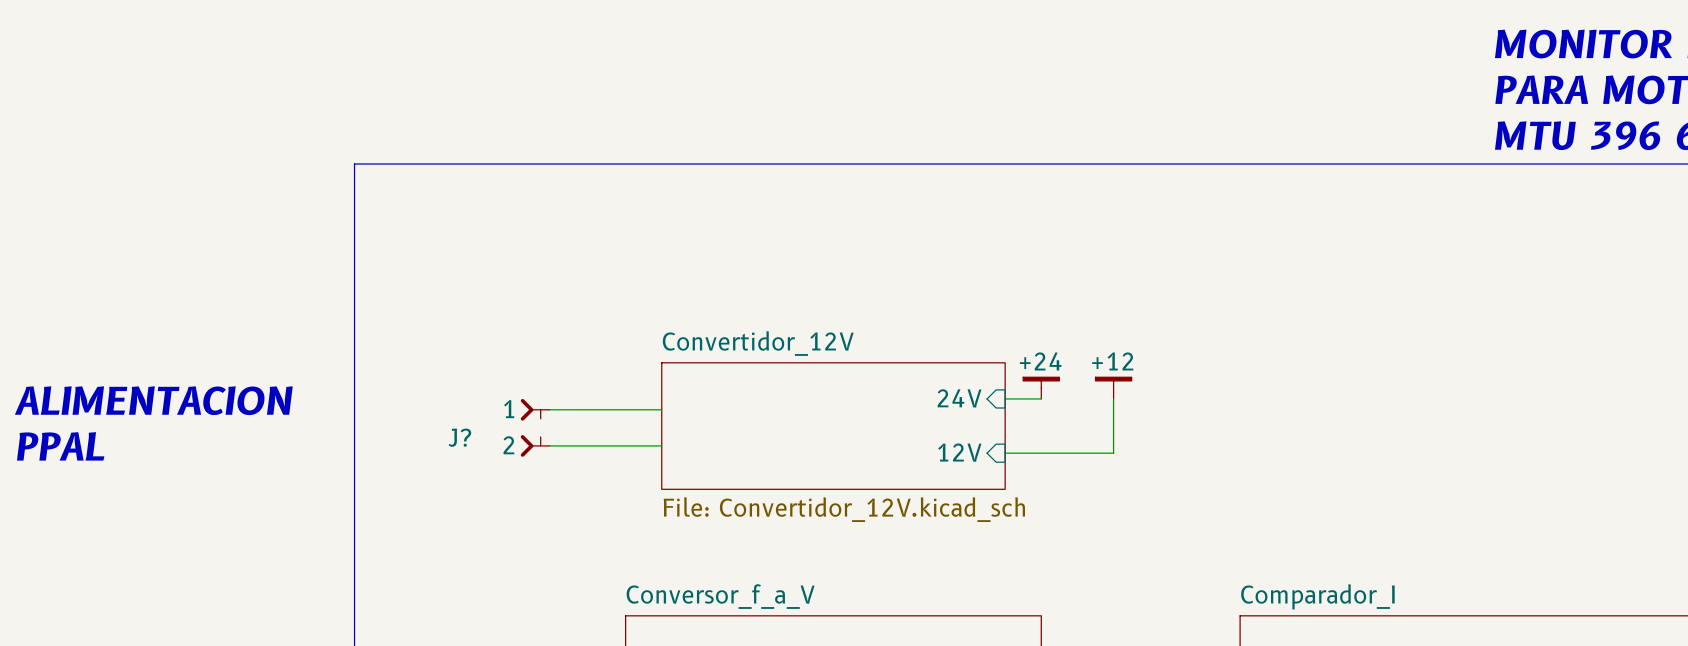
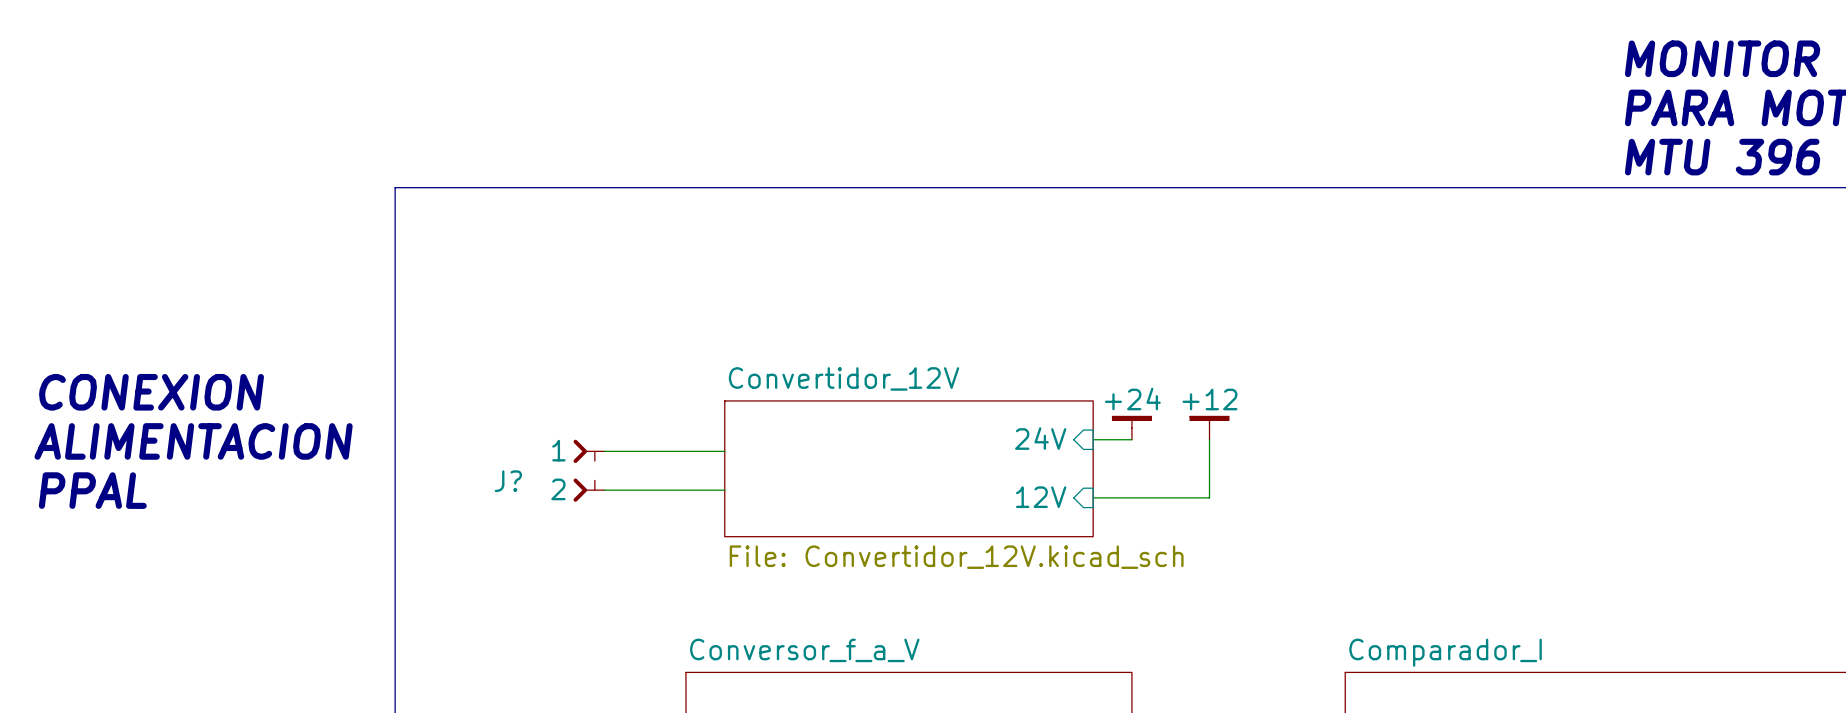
text: none -> CONEXION (151, 392)

